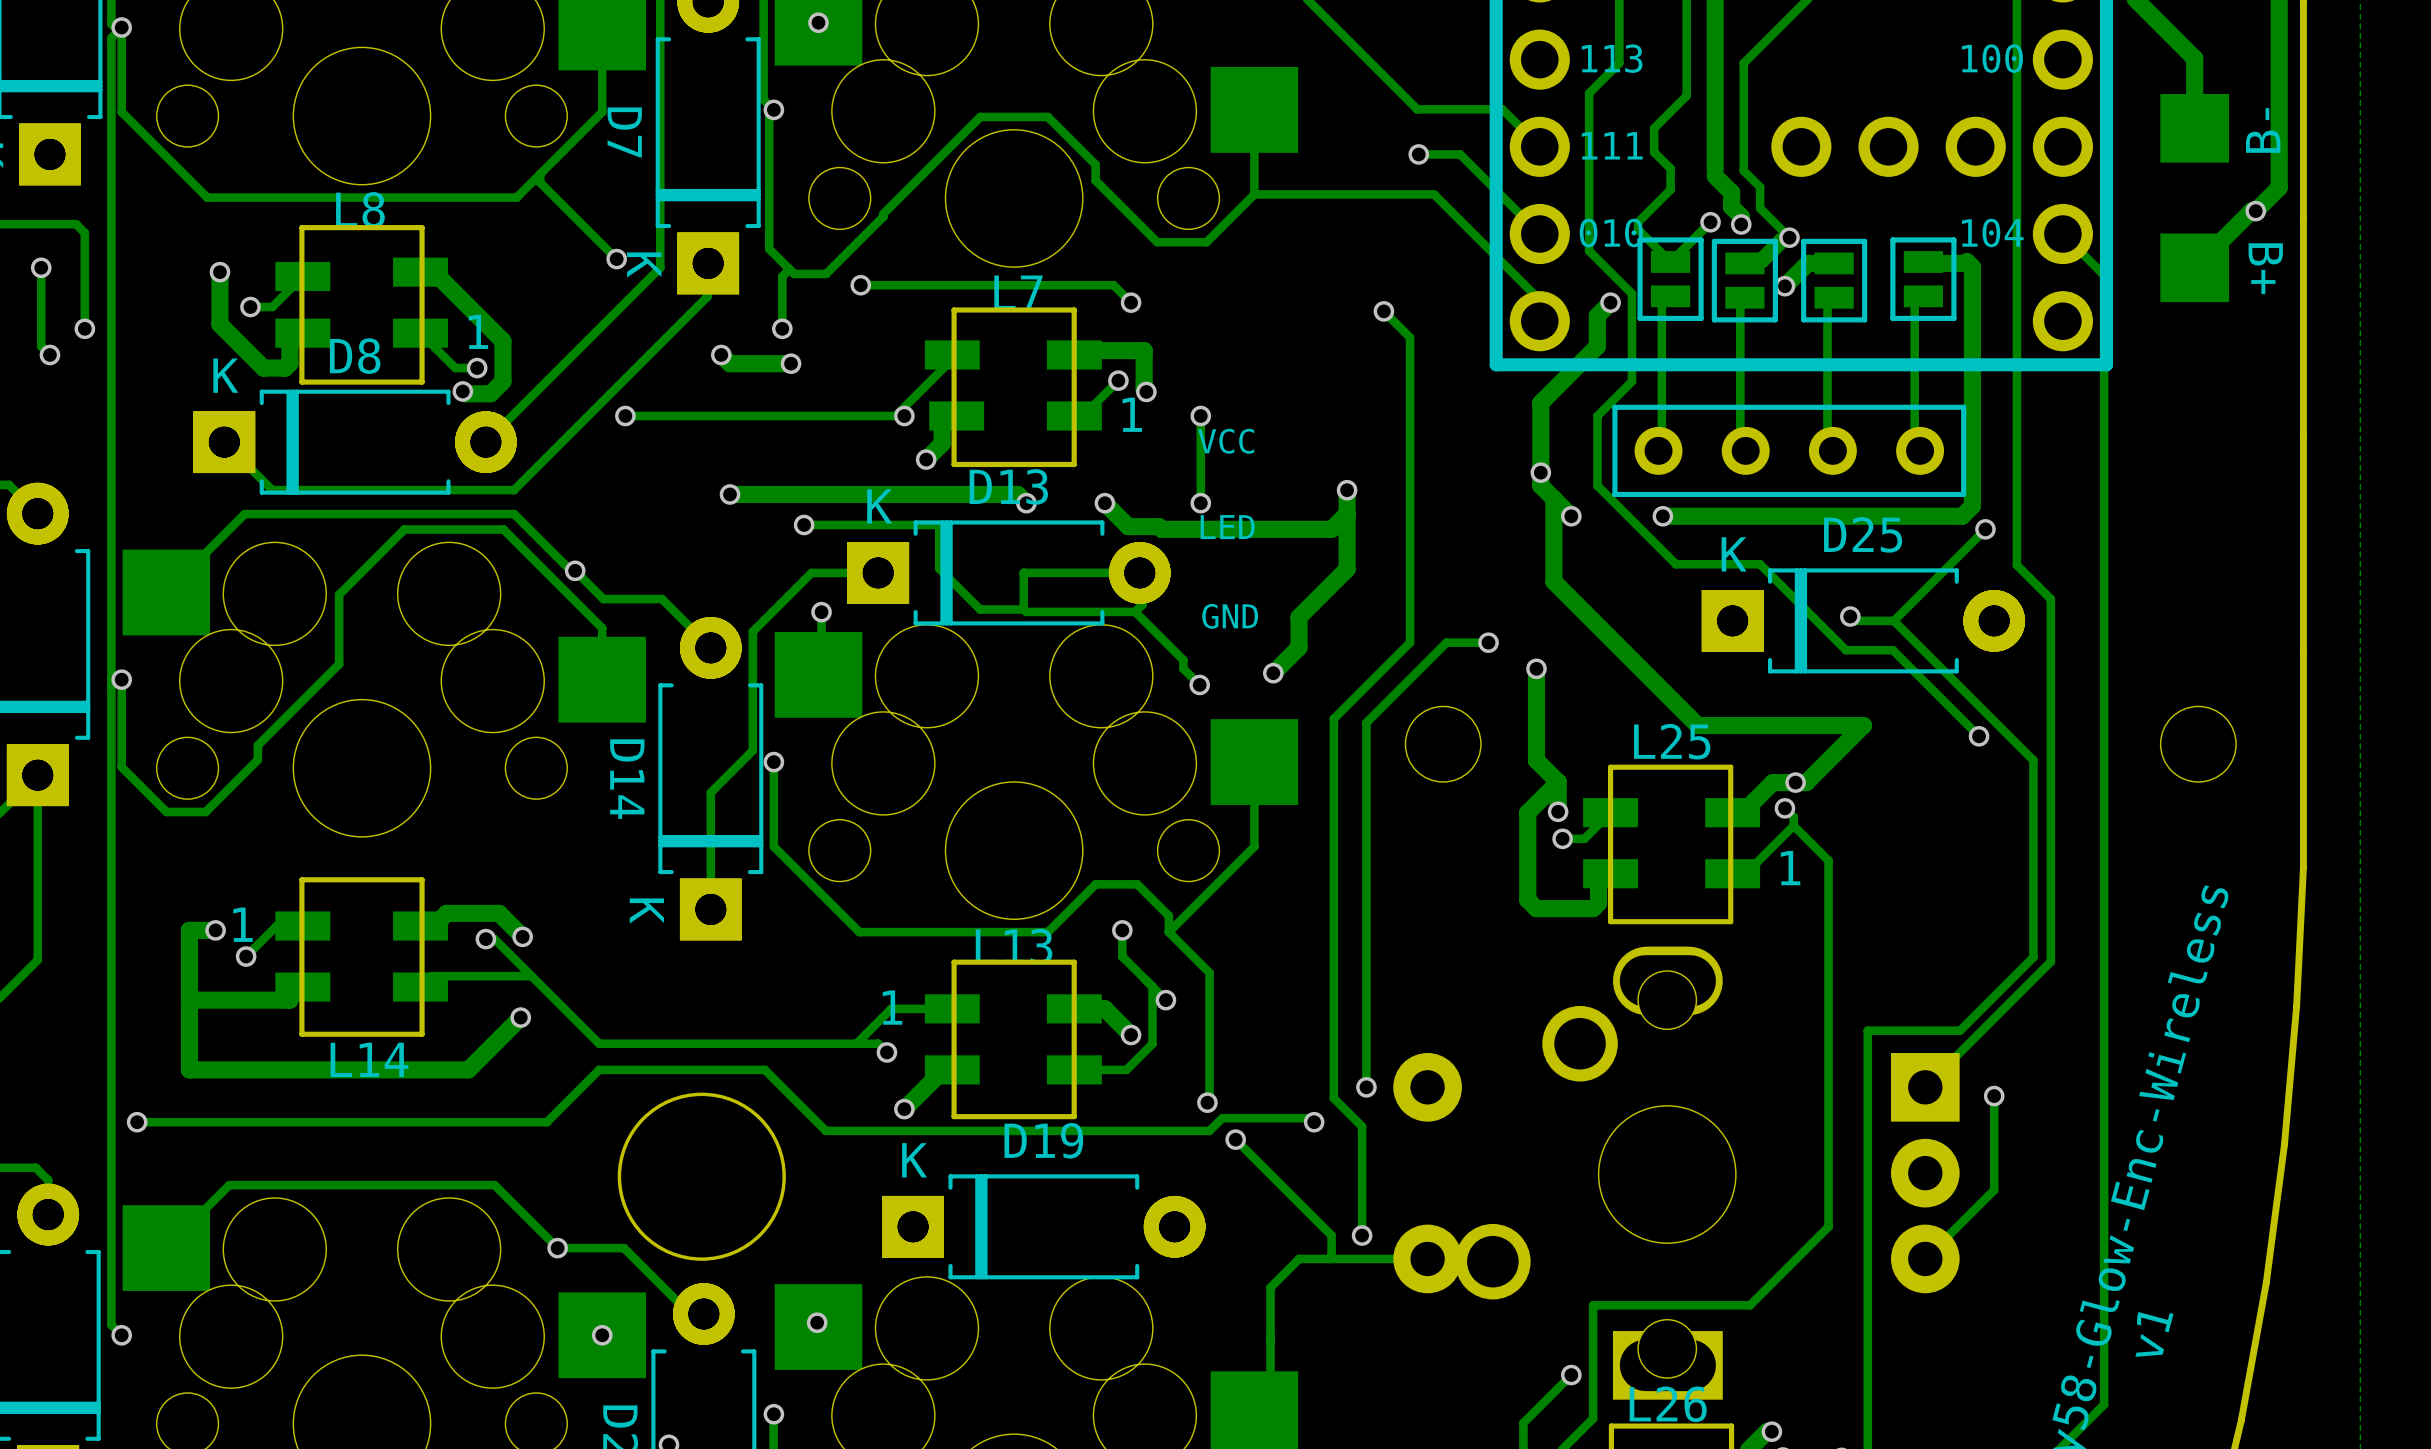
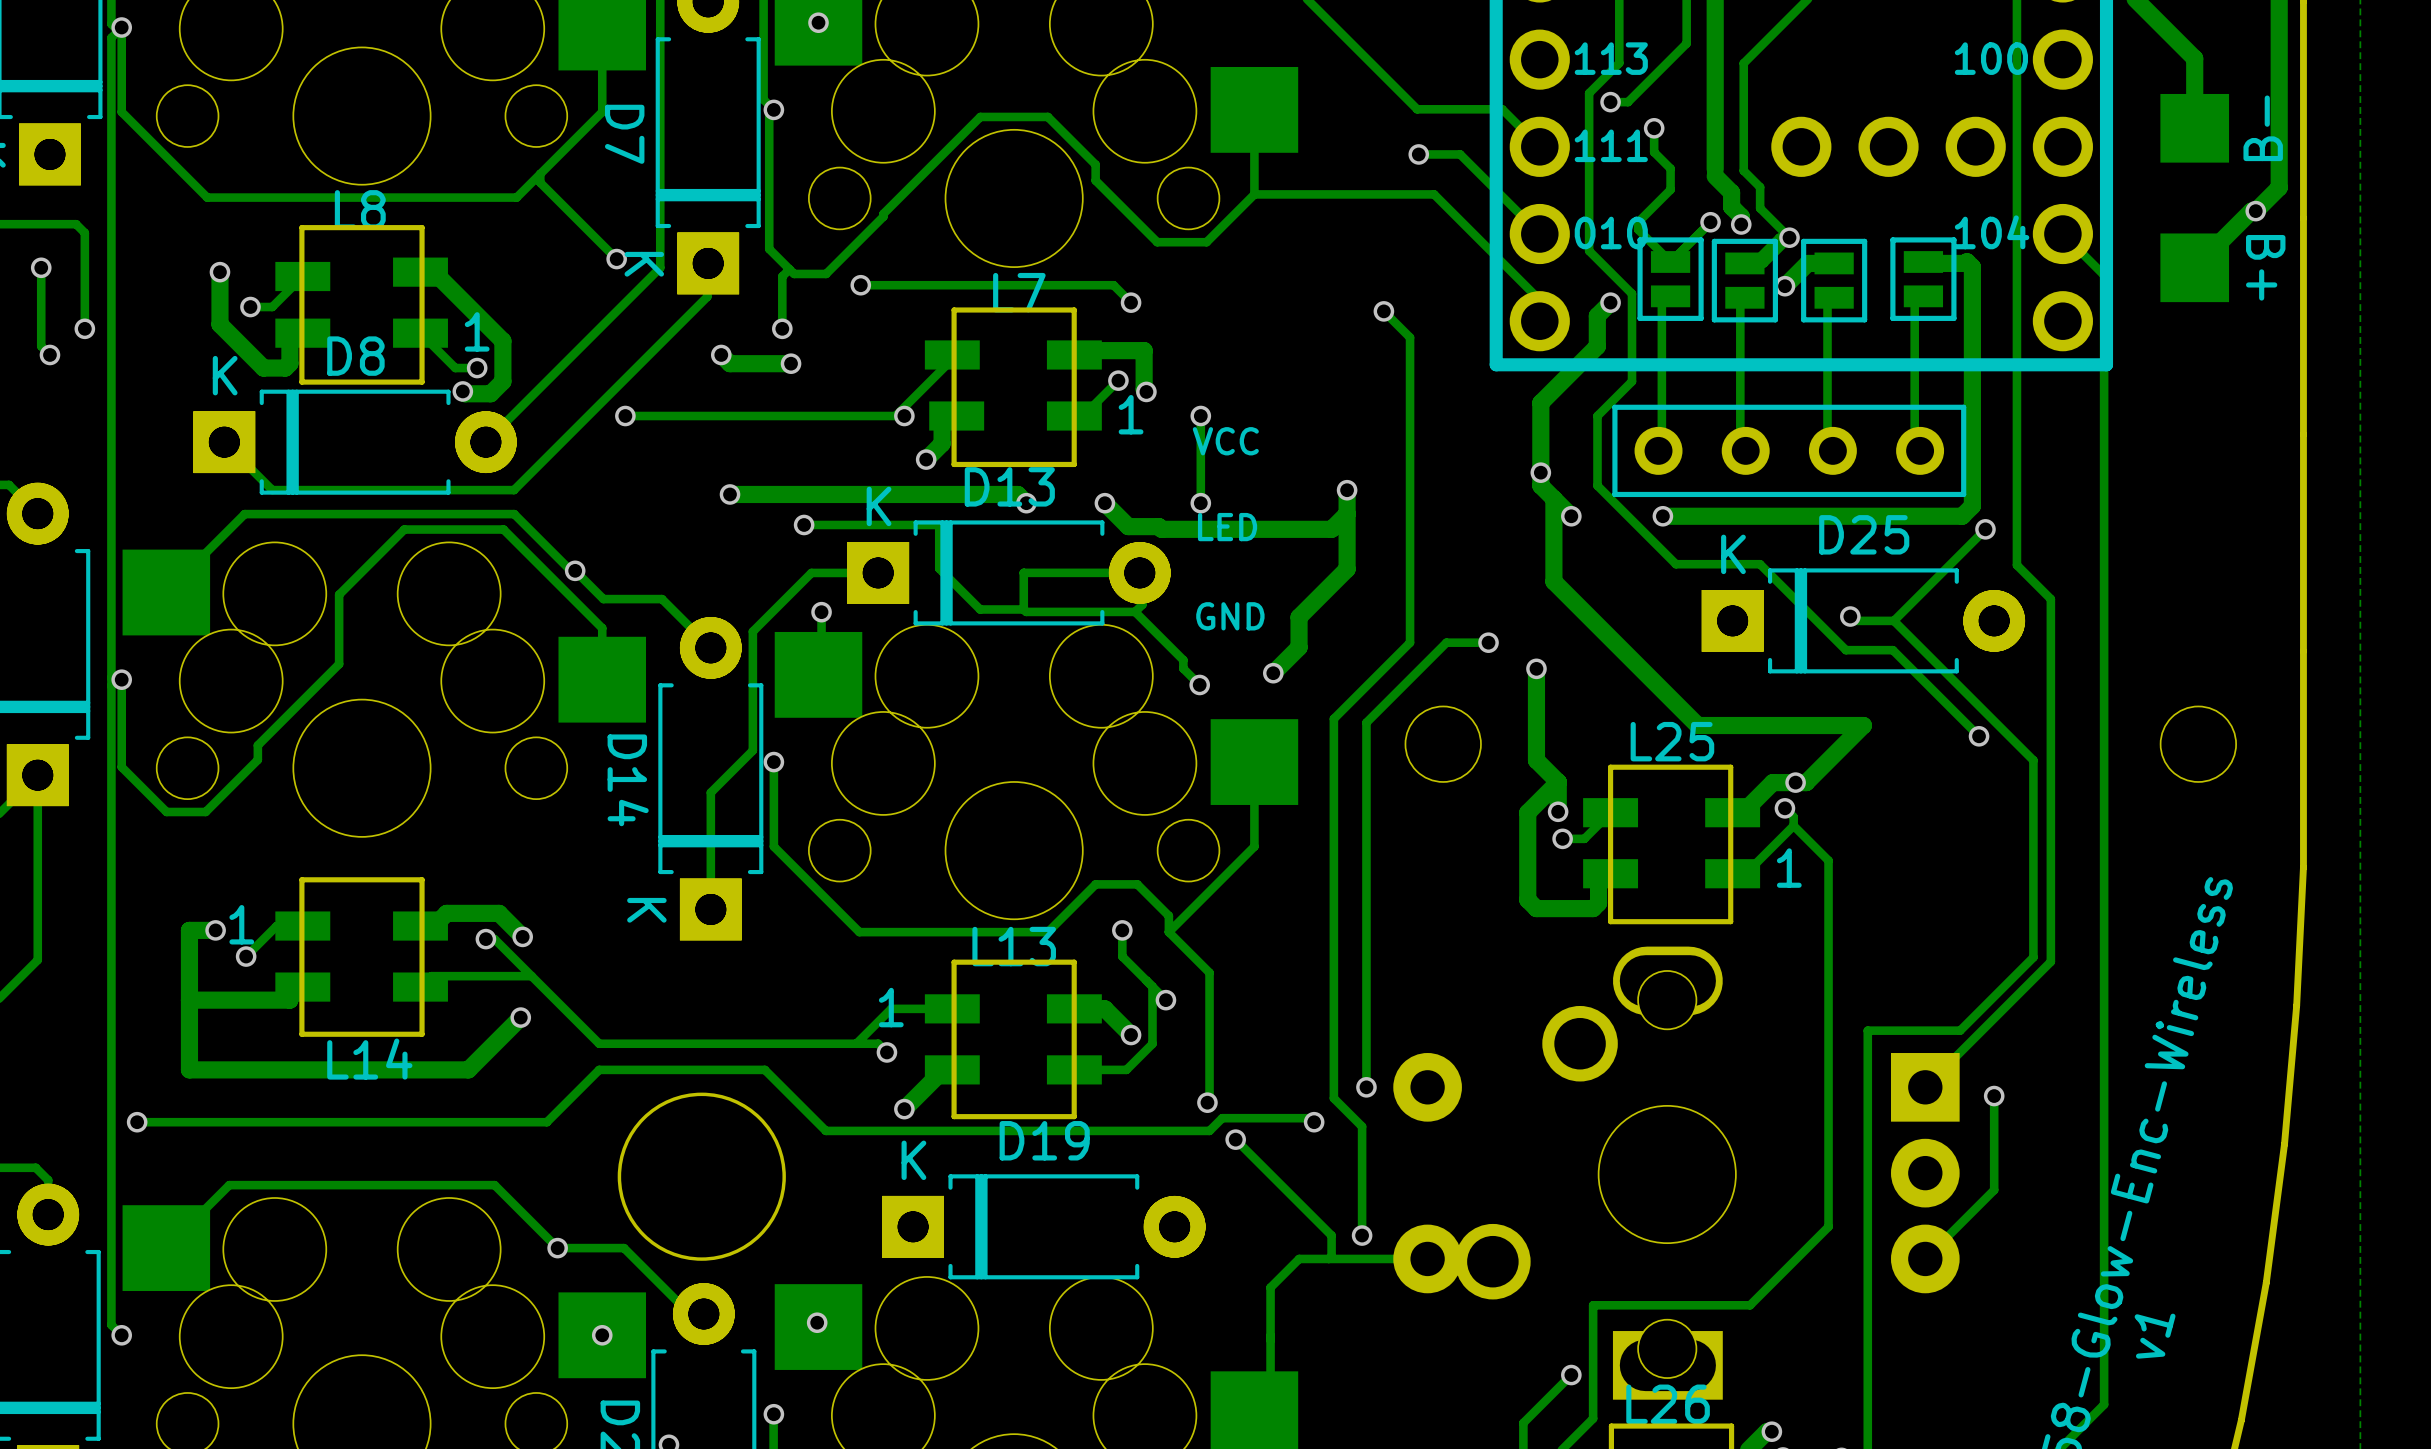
track: (1686, 43) (1686, 95) (1654, 128) -> (1686, 43) (1628, 102) (1610, 102)
via: none -> (1610, 102)
via: none -> (1654, 128)

